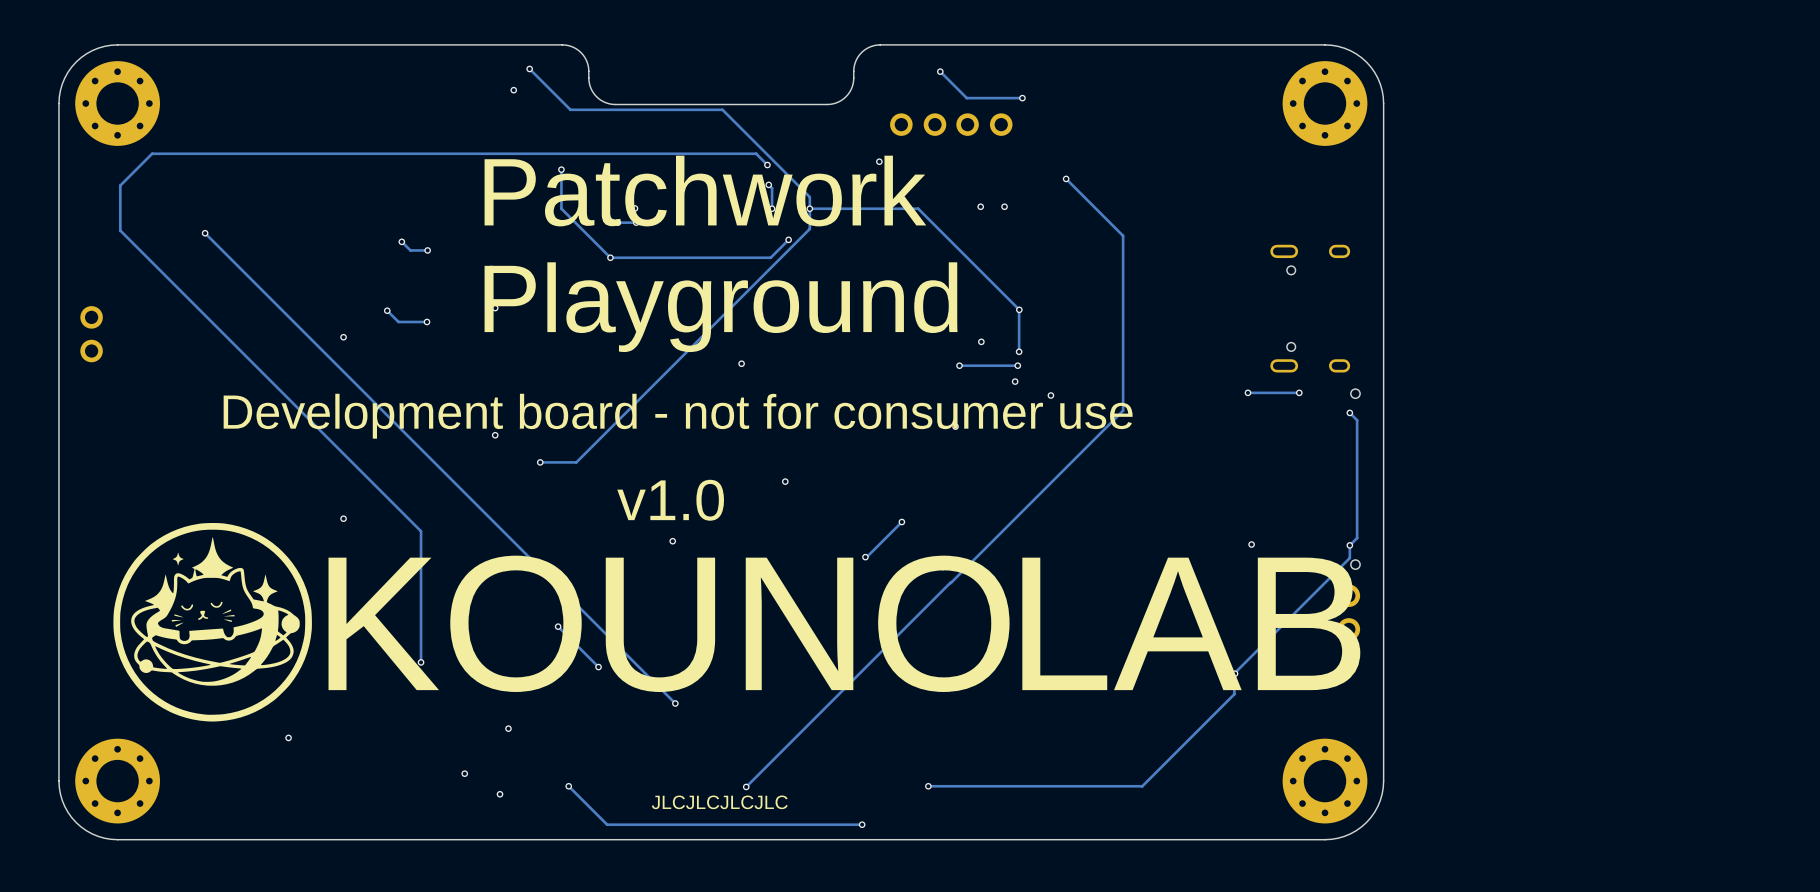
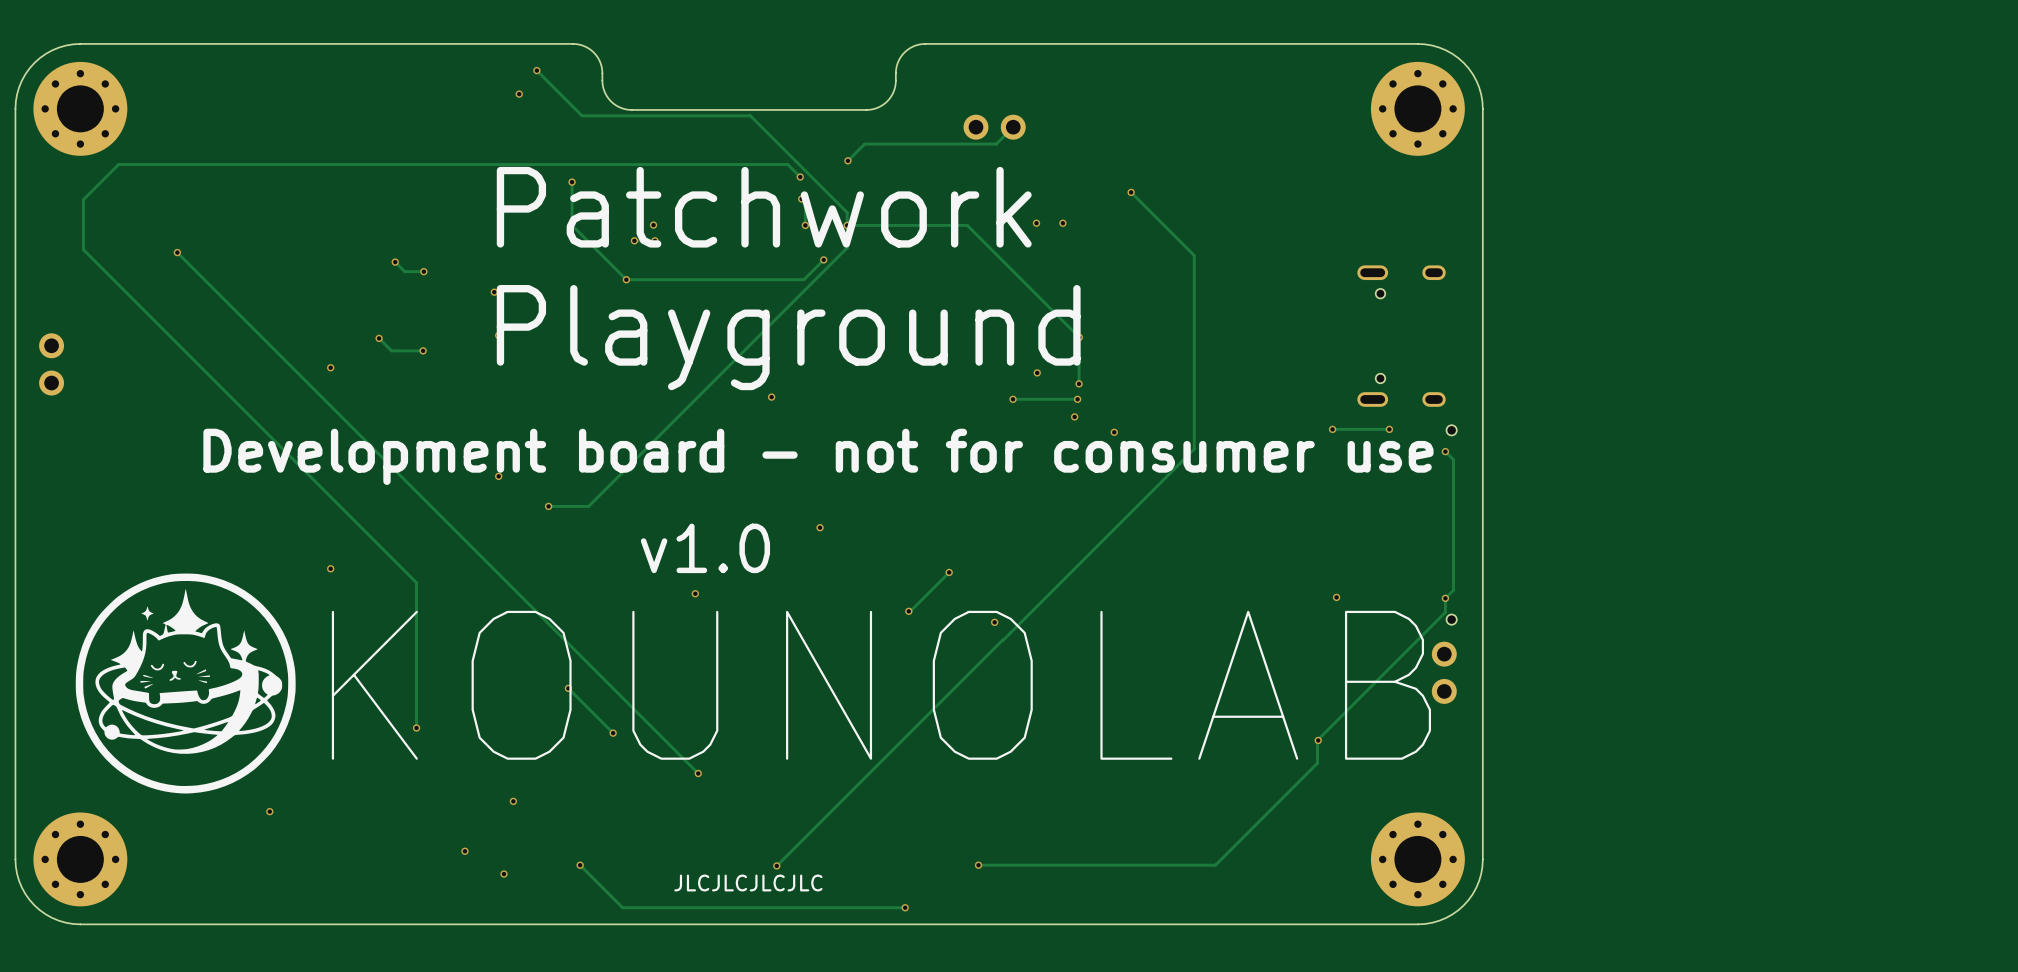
track: (940, 71) (966, 98) (1022, 98) -> none
via: (940, 71) -> none
via: (1022, 98) -> none
part: none -> (994, 127)
track: none -> (1013, 127) (996, 144) (864, 144) (847, 160)
part: (918, 124) -> none
part: (984, 124) -> none
via position: (879, 161) -> (847, 160)

